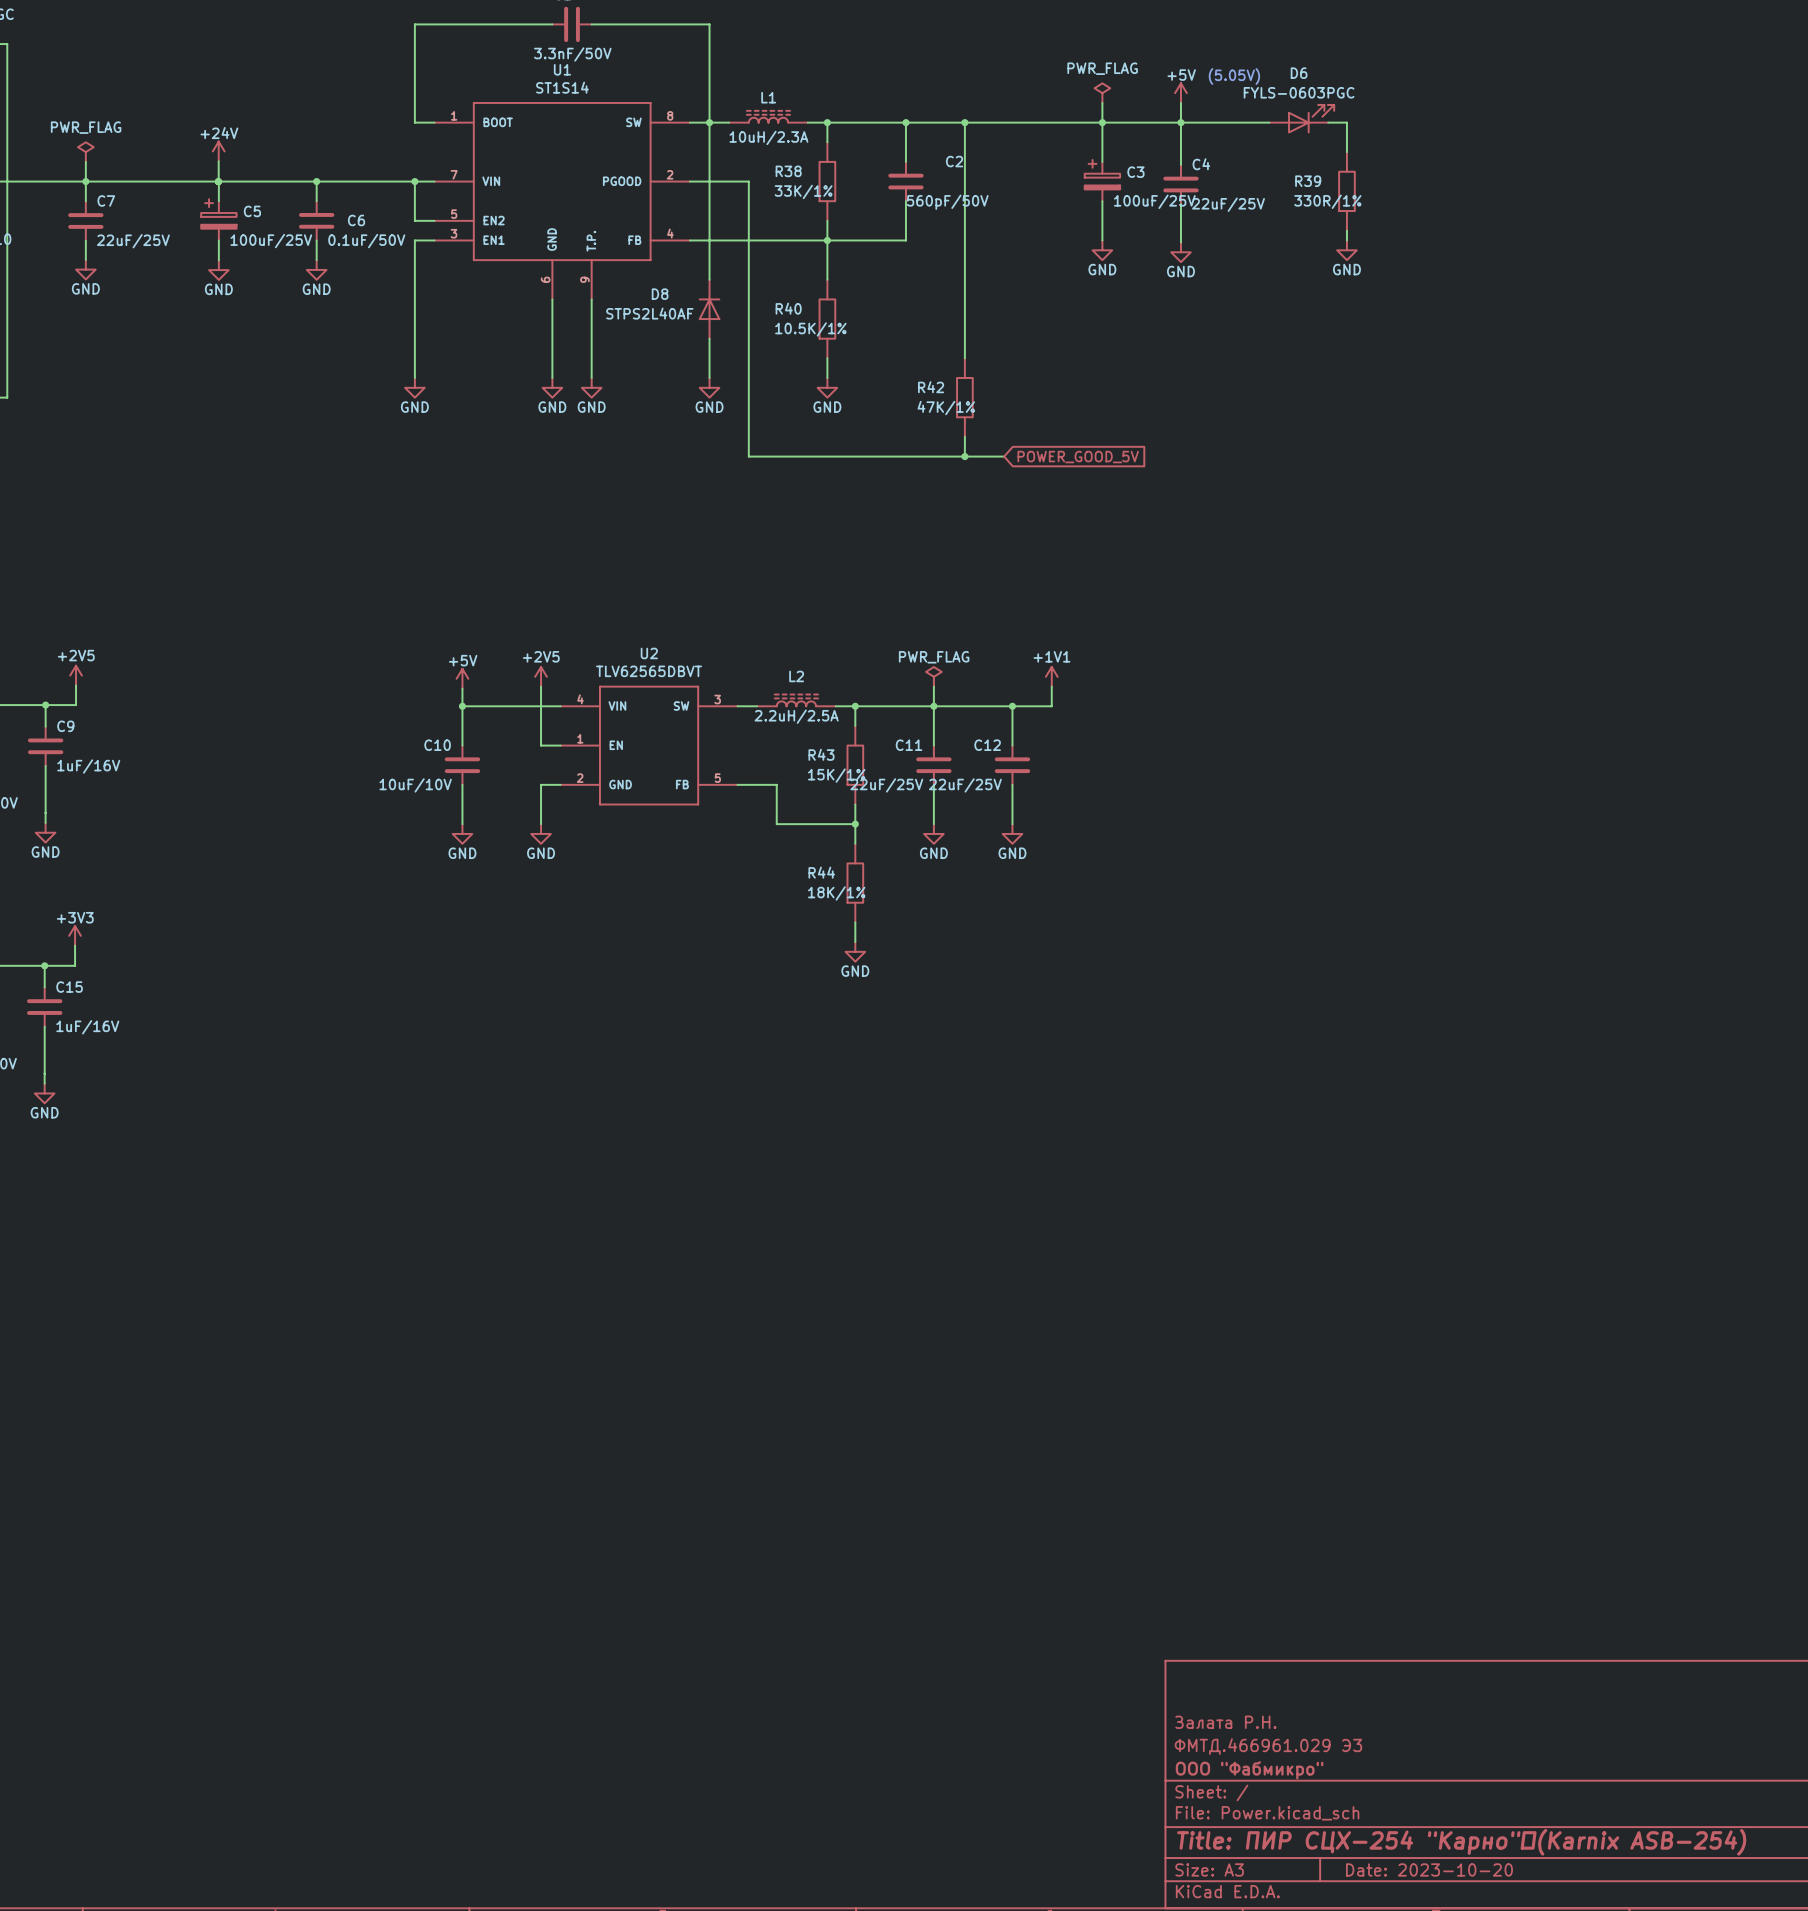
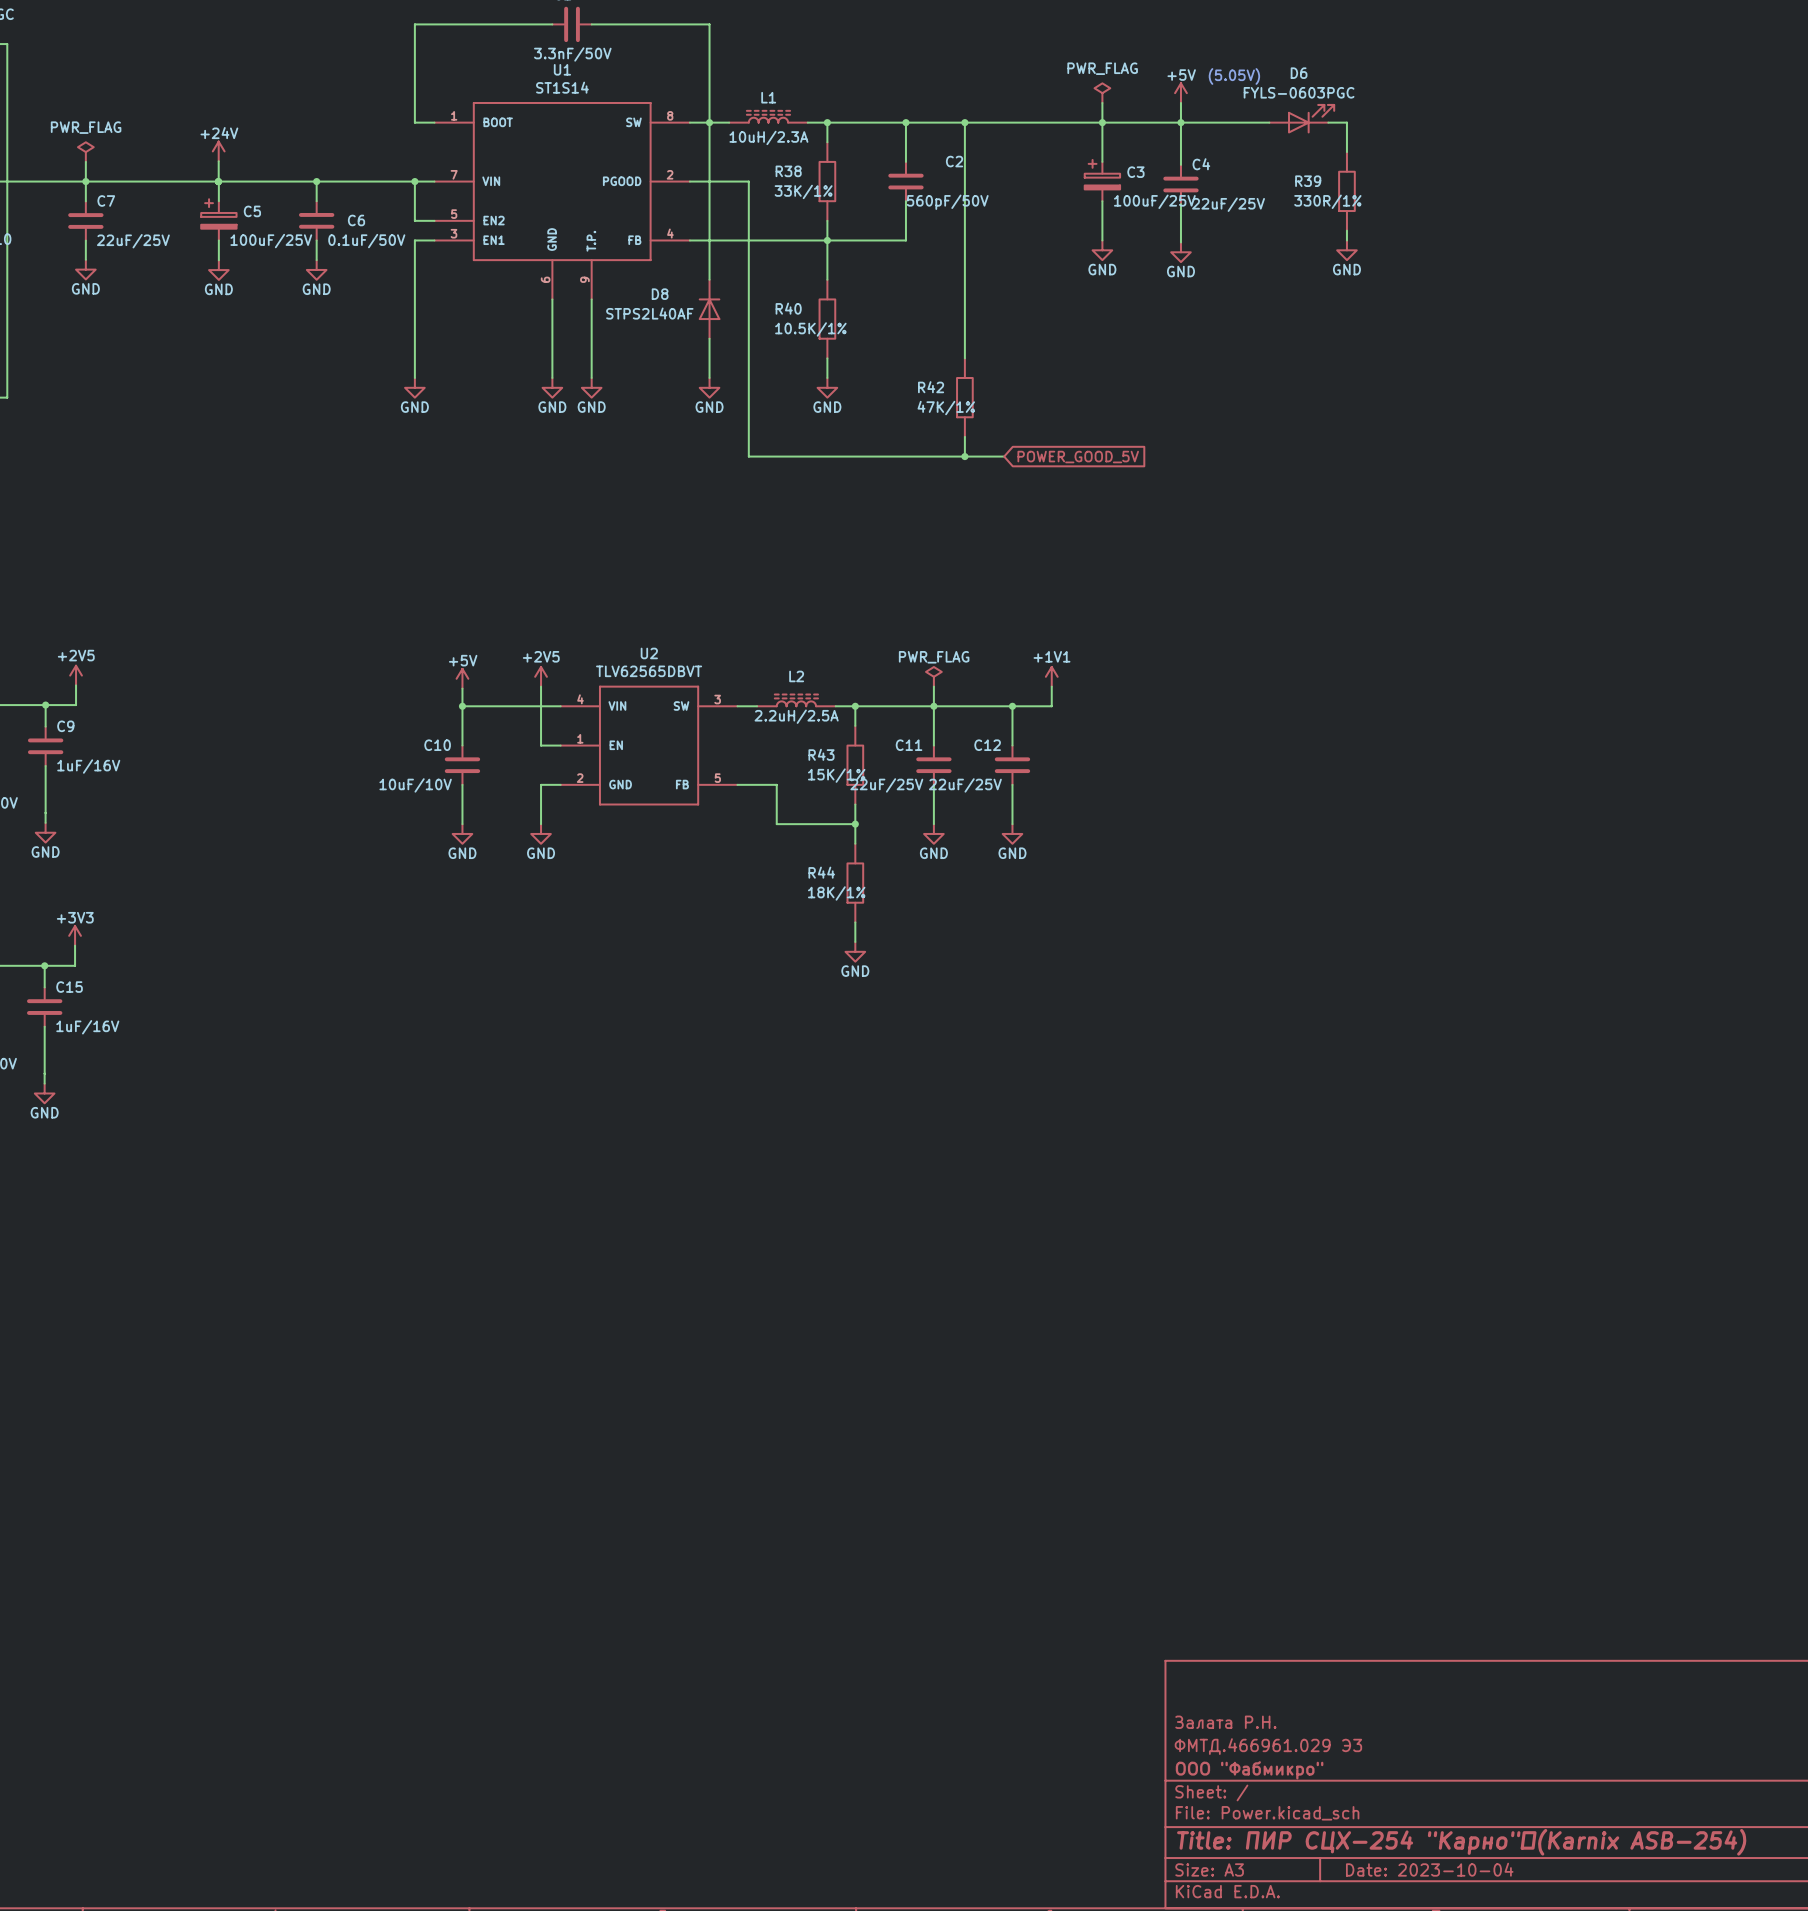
title block: Date: 2023-10-20 (1429, 1869) -> Date: 2023-10-04 (1429, 1869)

